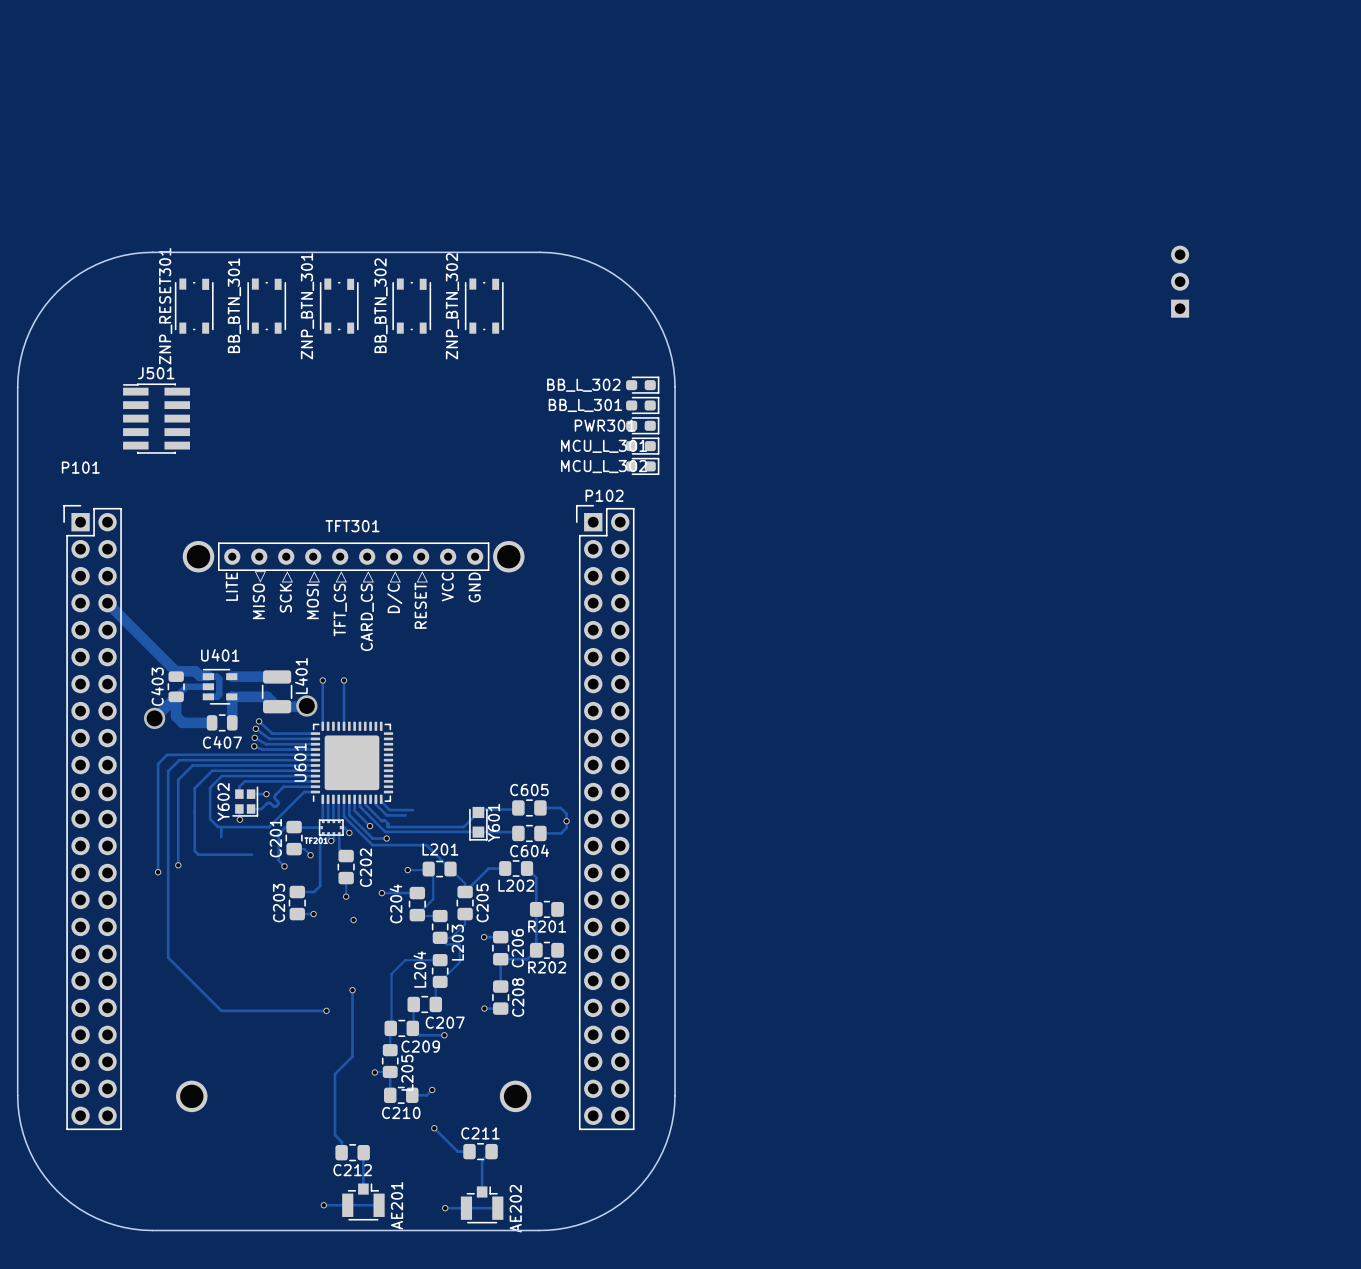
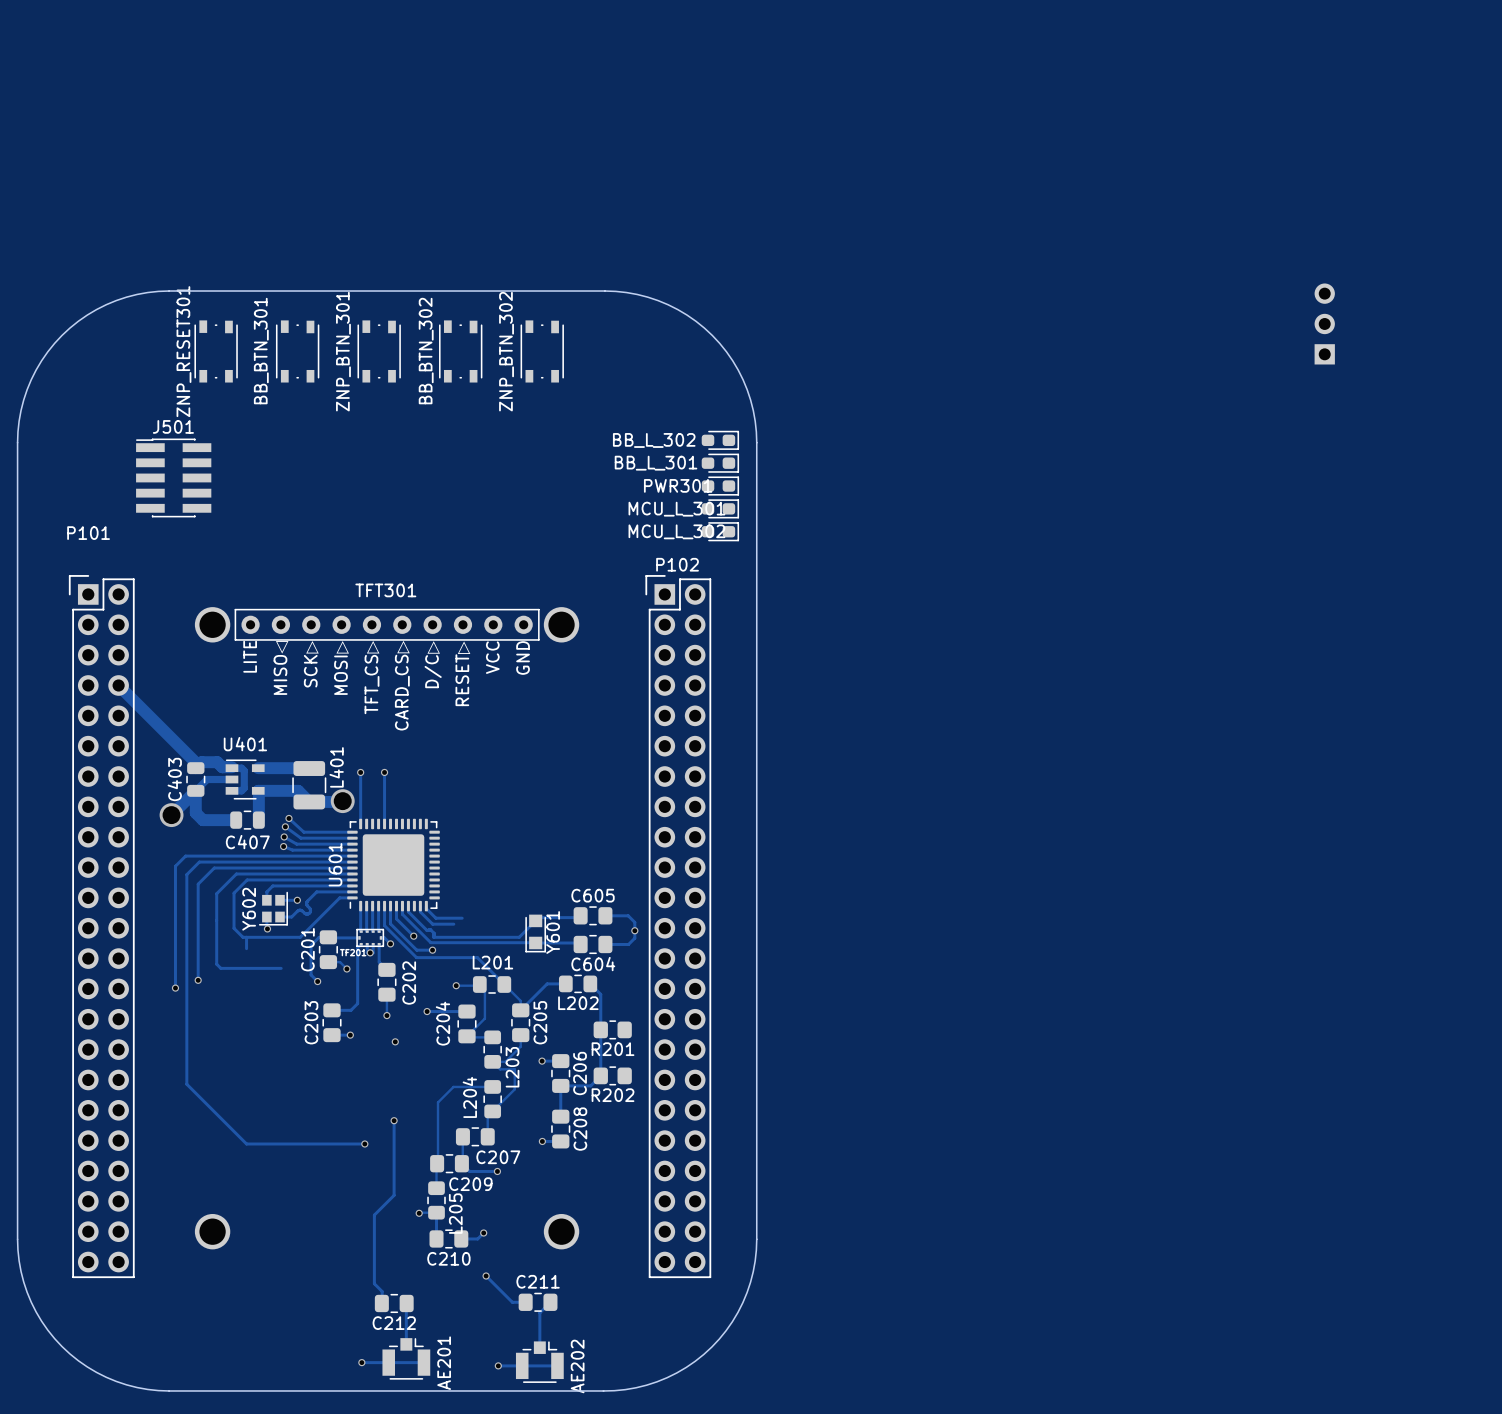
TFT301 footprint: [176, 540, 532, 1113] -> [194, 607, 580, 1250]

